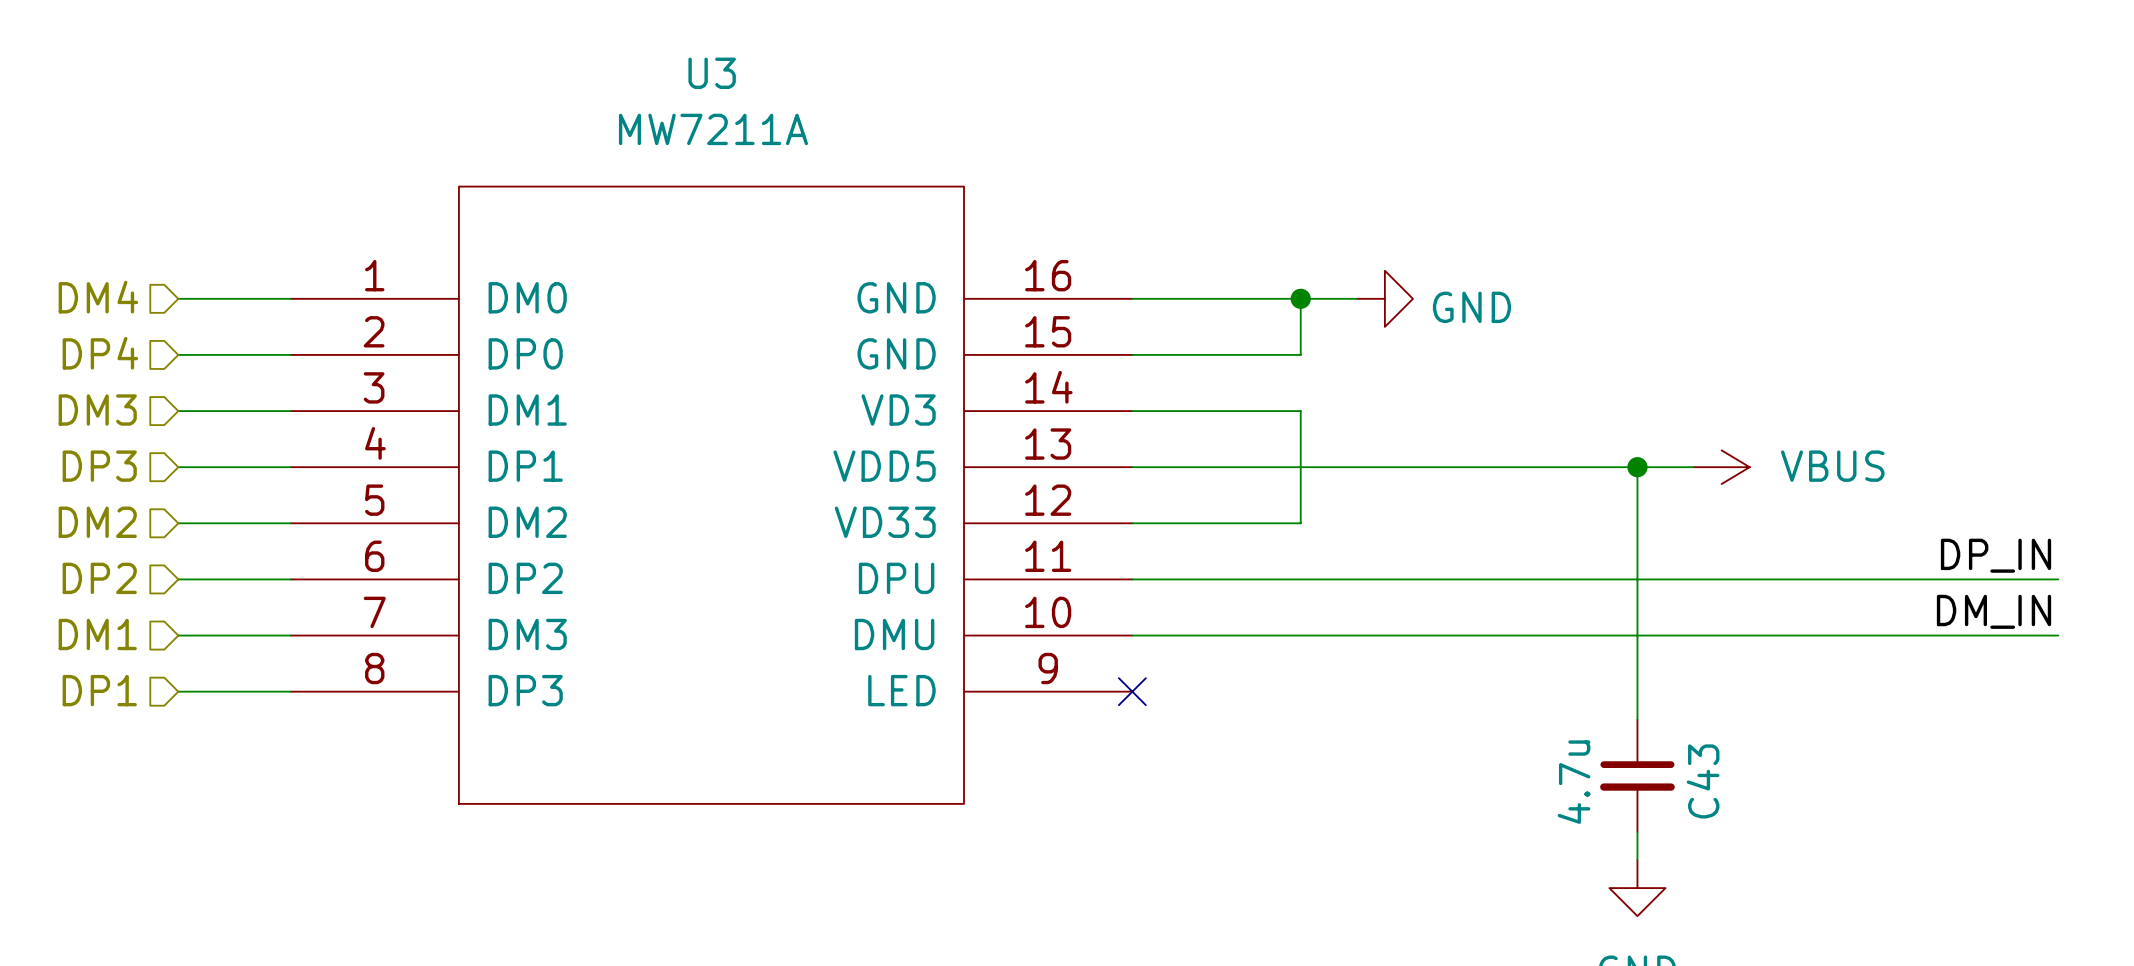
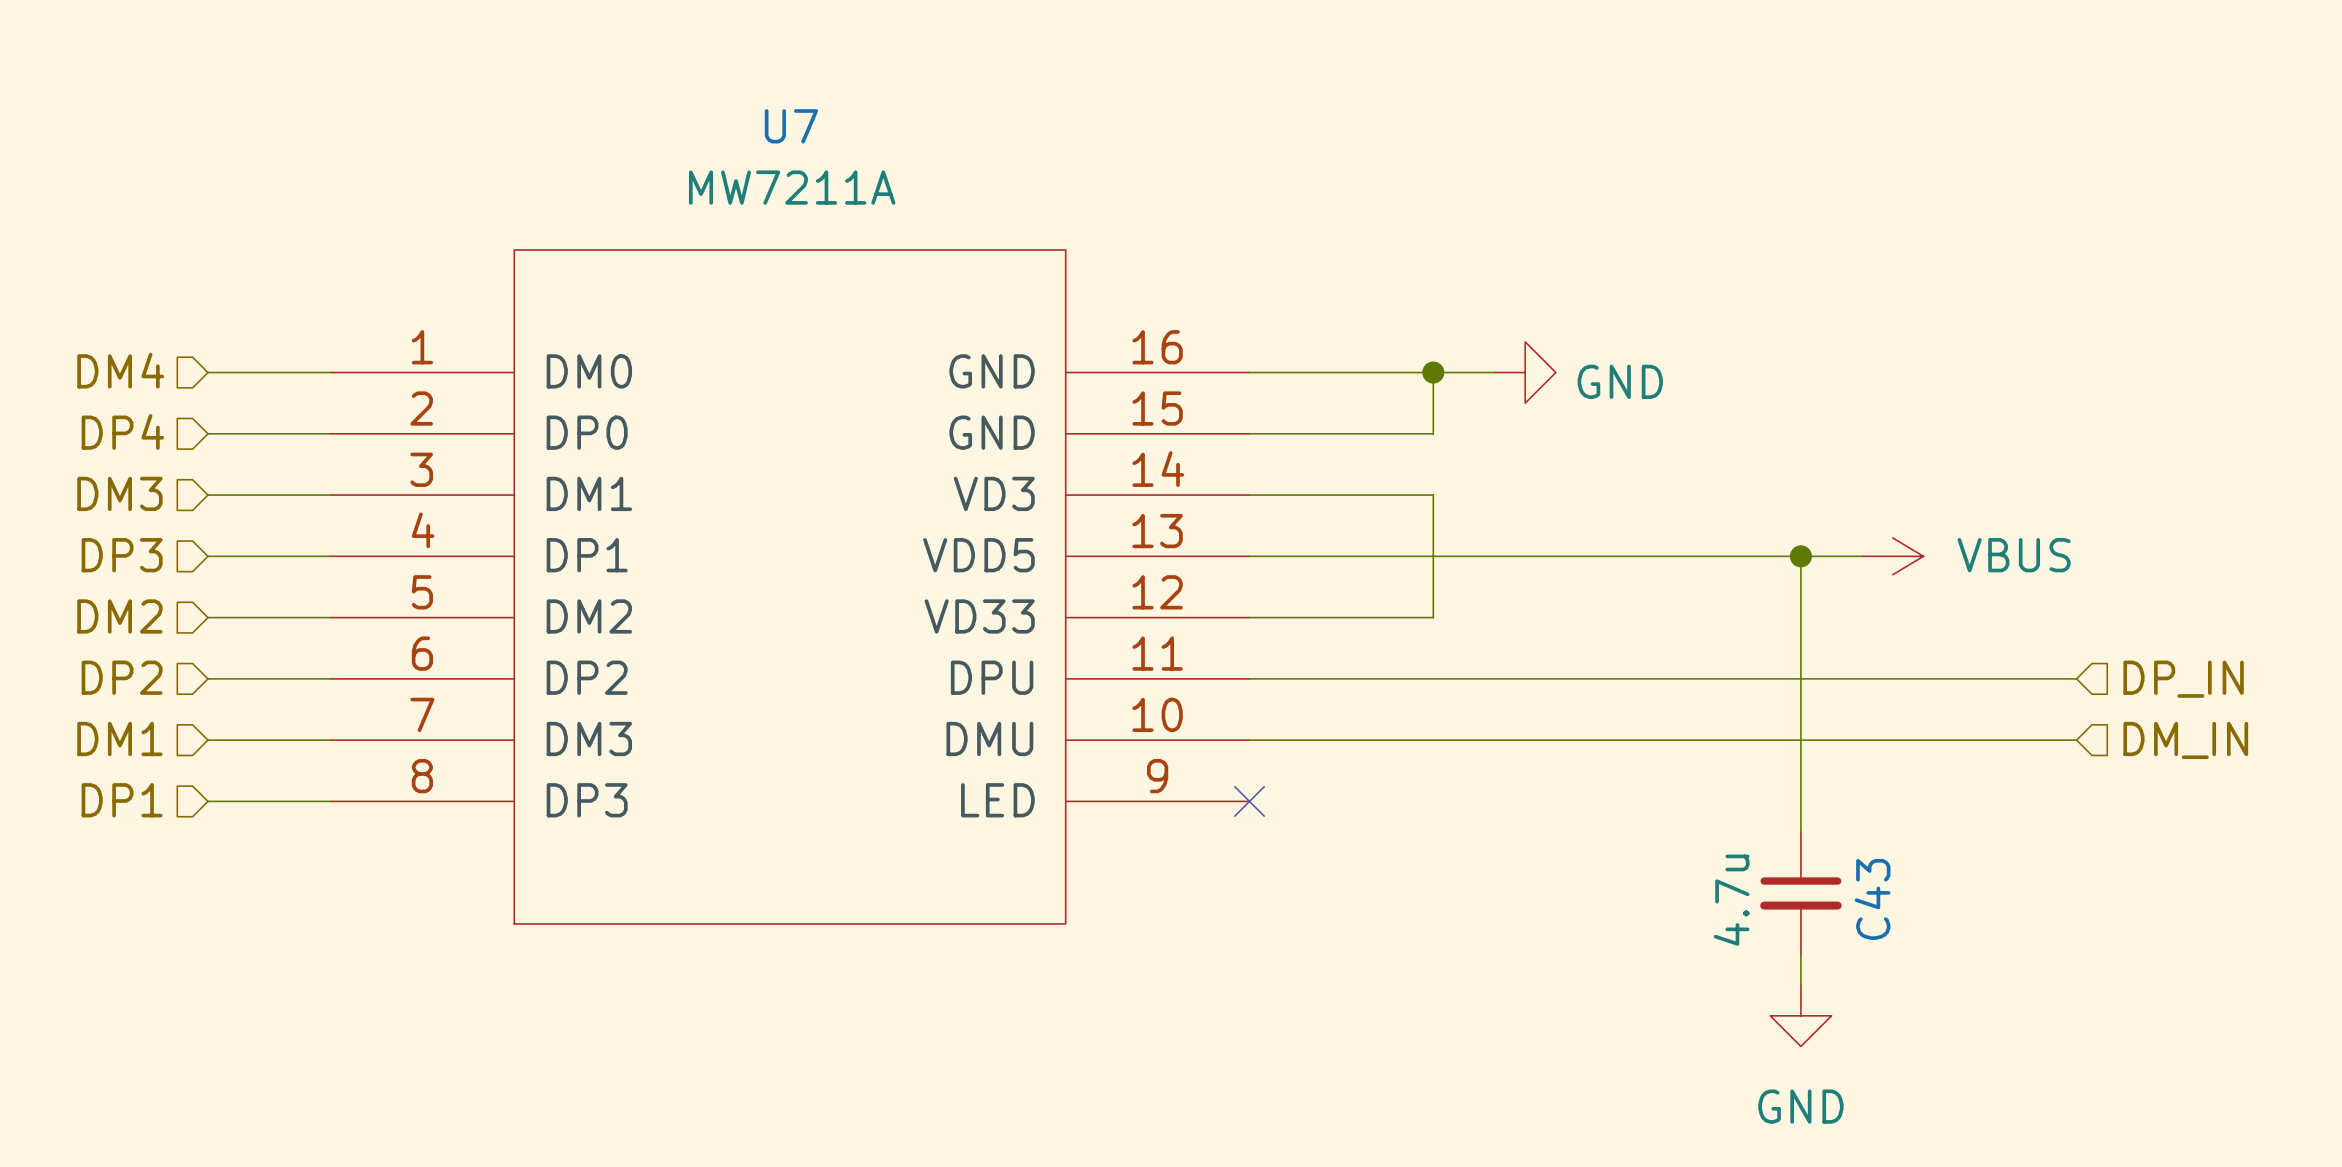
U3 name: U3 (712, 73) -> U7 (791, 126)
label: DP_IN (1996, 555) -> none
wire: (1889, 579) (2058, 579) -> none
hierarchical label: none -> DP_IN (2183, 679)
label: DM_IN (1994, 611) -> none
wire: (1889, 635) (2058, 635) -> none
hierarchical label: none -> DM_IN (2185, 740)

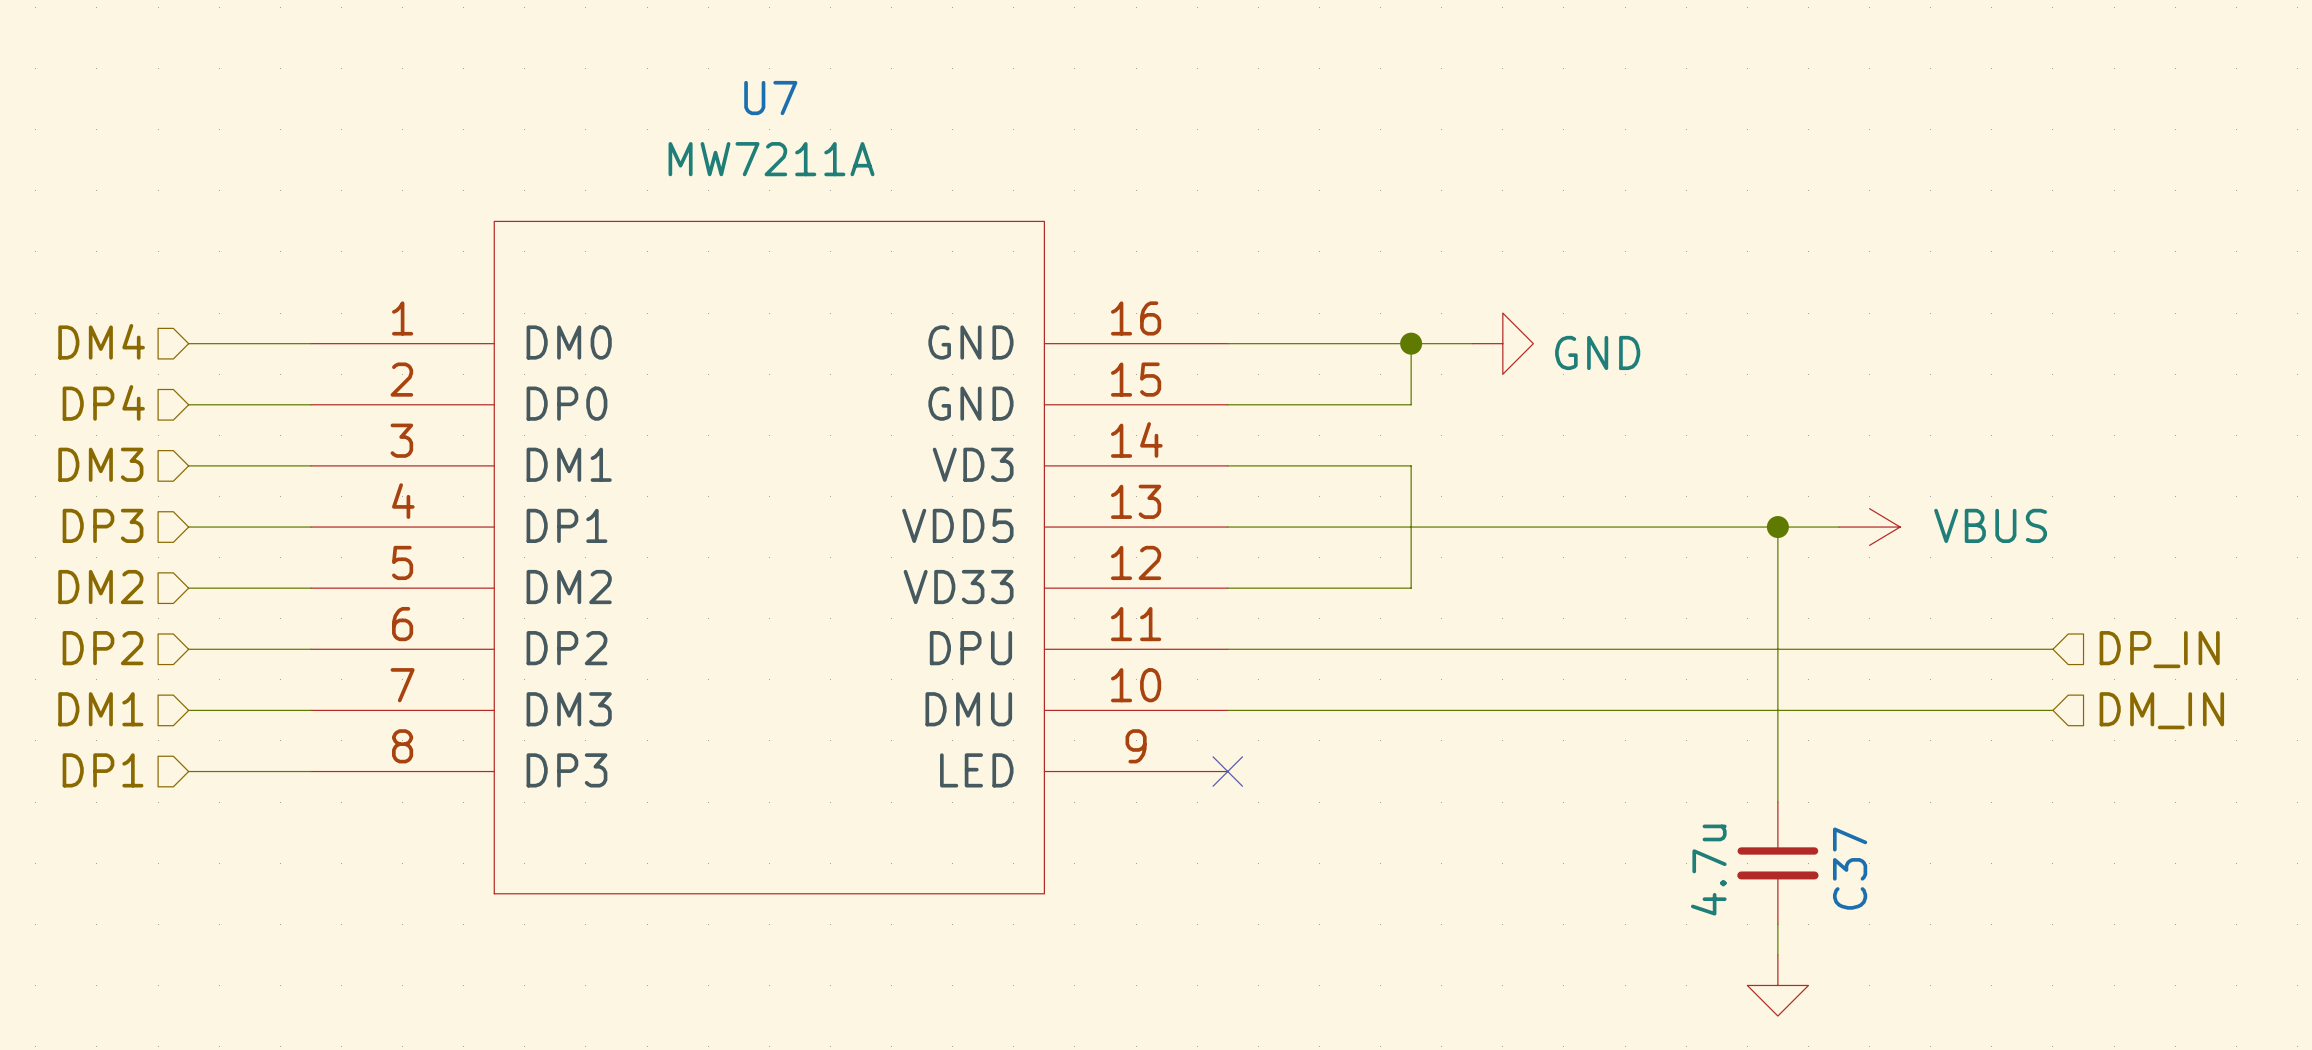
C43 name: C43 (1872, 899) -> C37 (1850, 868)

